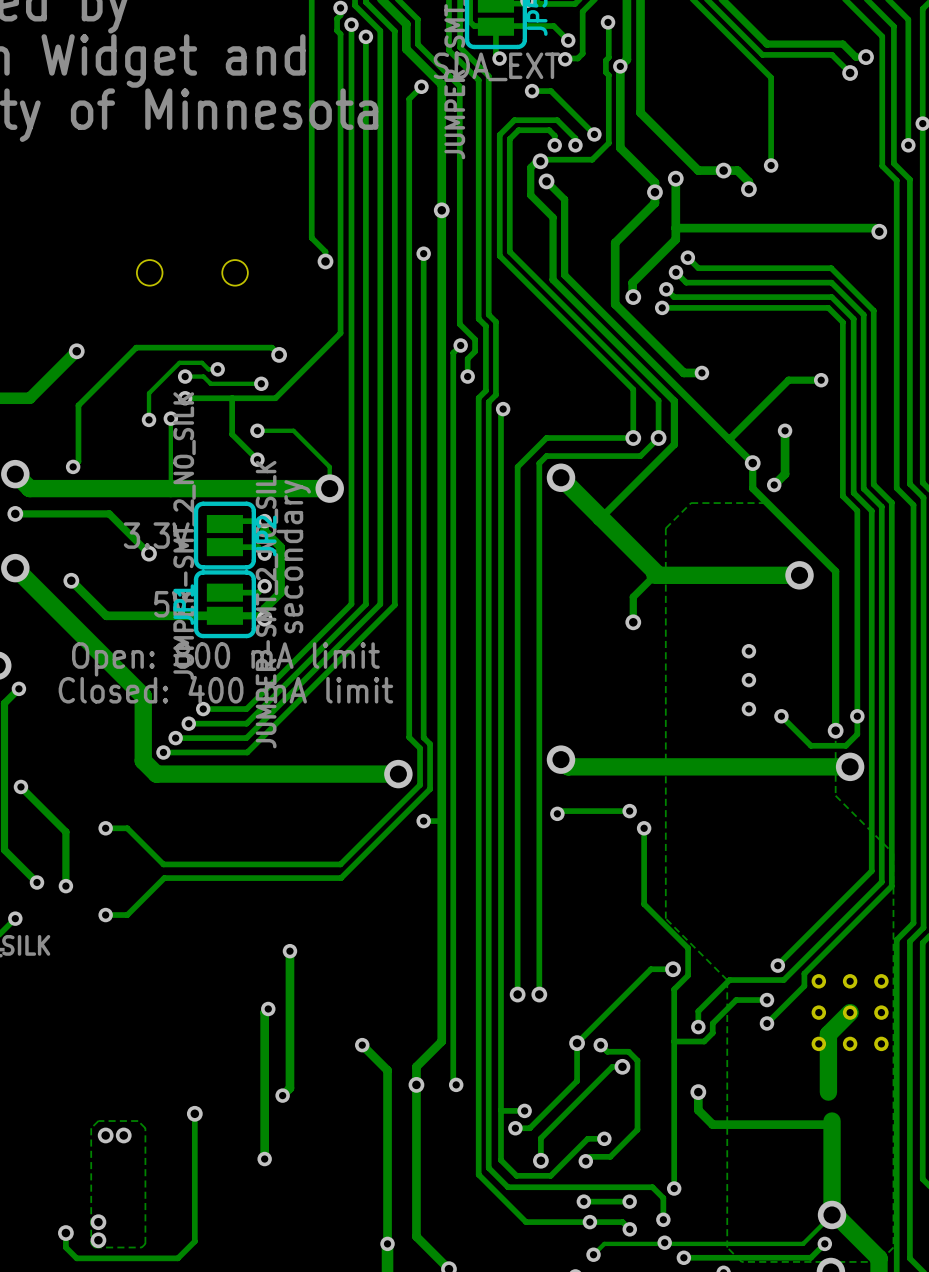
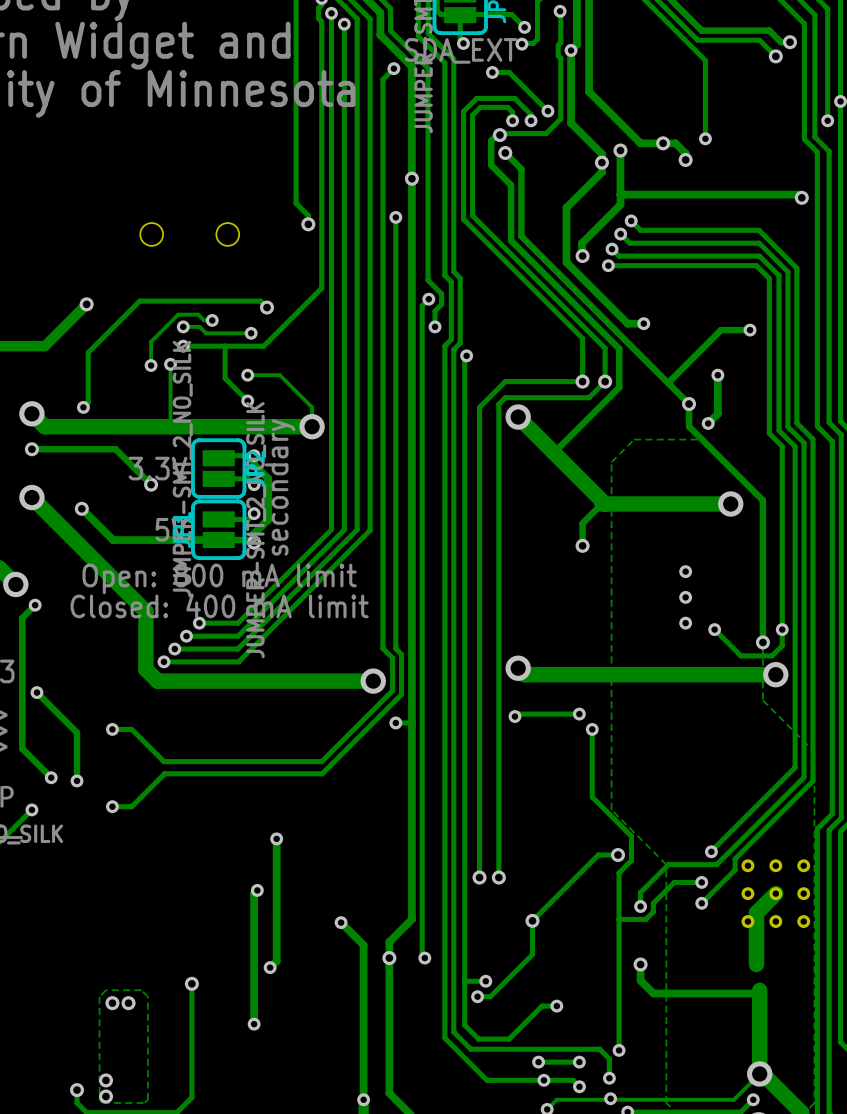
track: (600, 1045) (607, 1051) (628, 1051) (637, 1060) (637, 1129) (610, 1156) (590, 1156) (585, 1161) -> none
via: (600, 1045) -> none
track: (622, 1066) (612, 1066) (540, 1138) (540, 1160) -> none
via: (622, 1066) -> none
via: (540, 1160) -> none
via: (585, 1161) -> none

